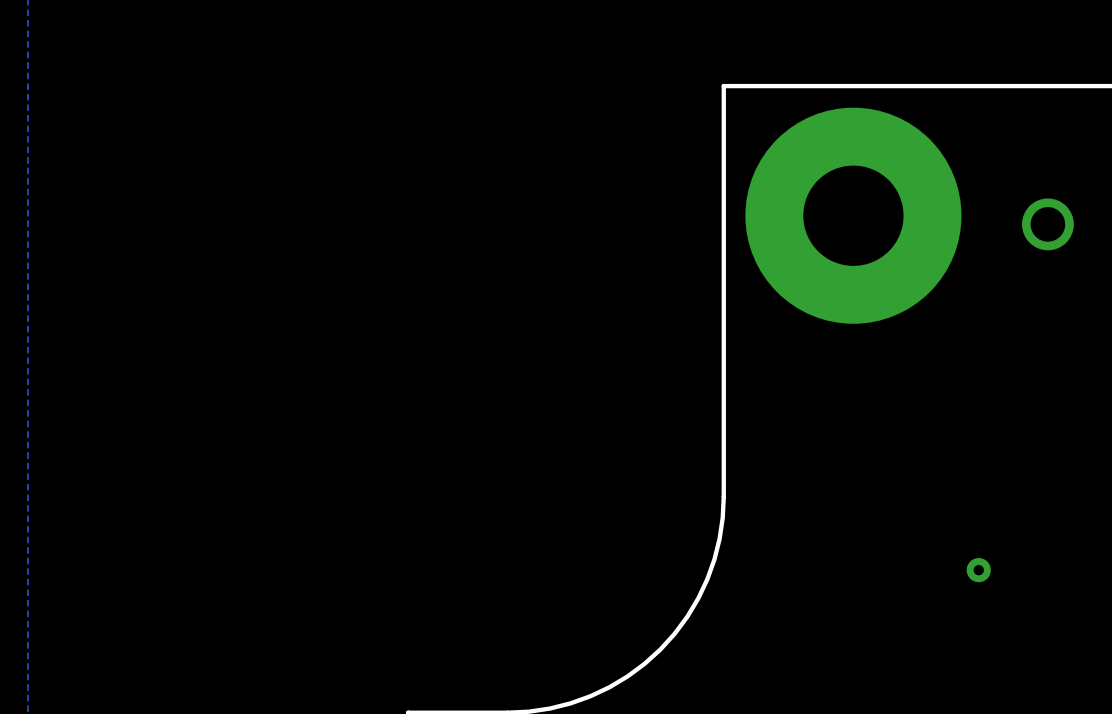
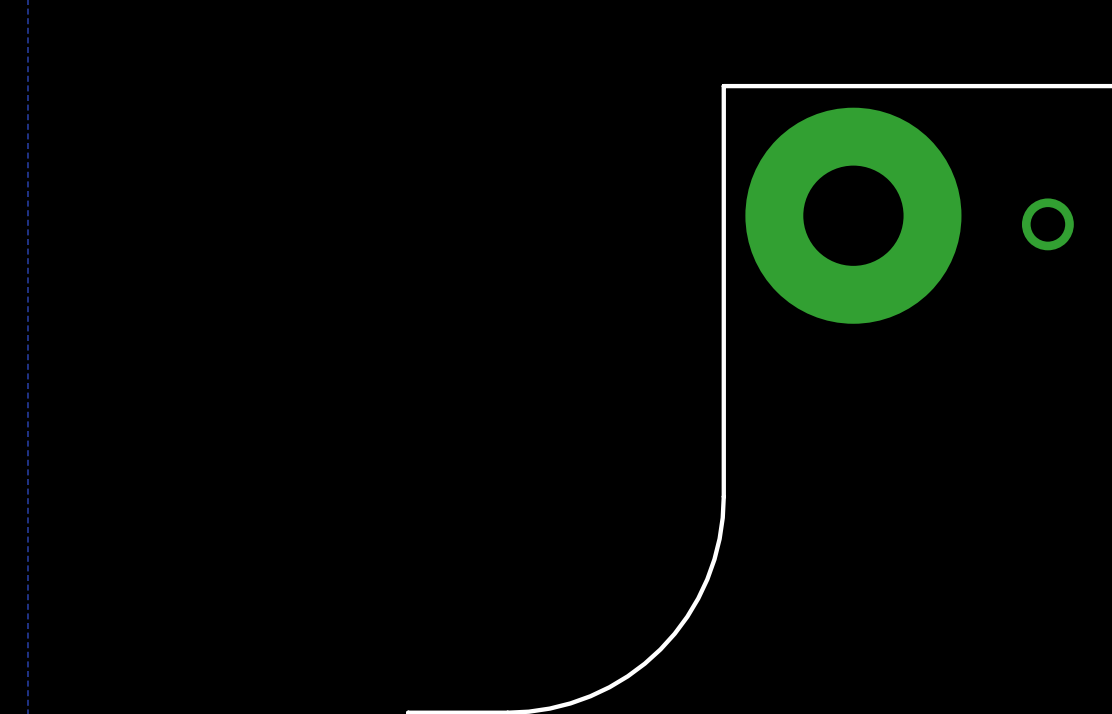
via: (978, 570) -> none

